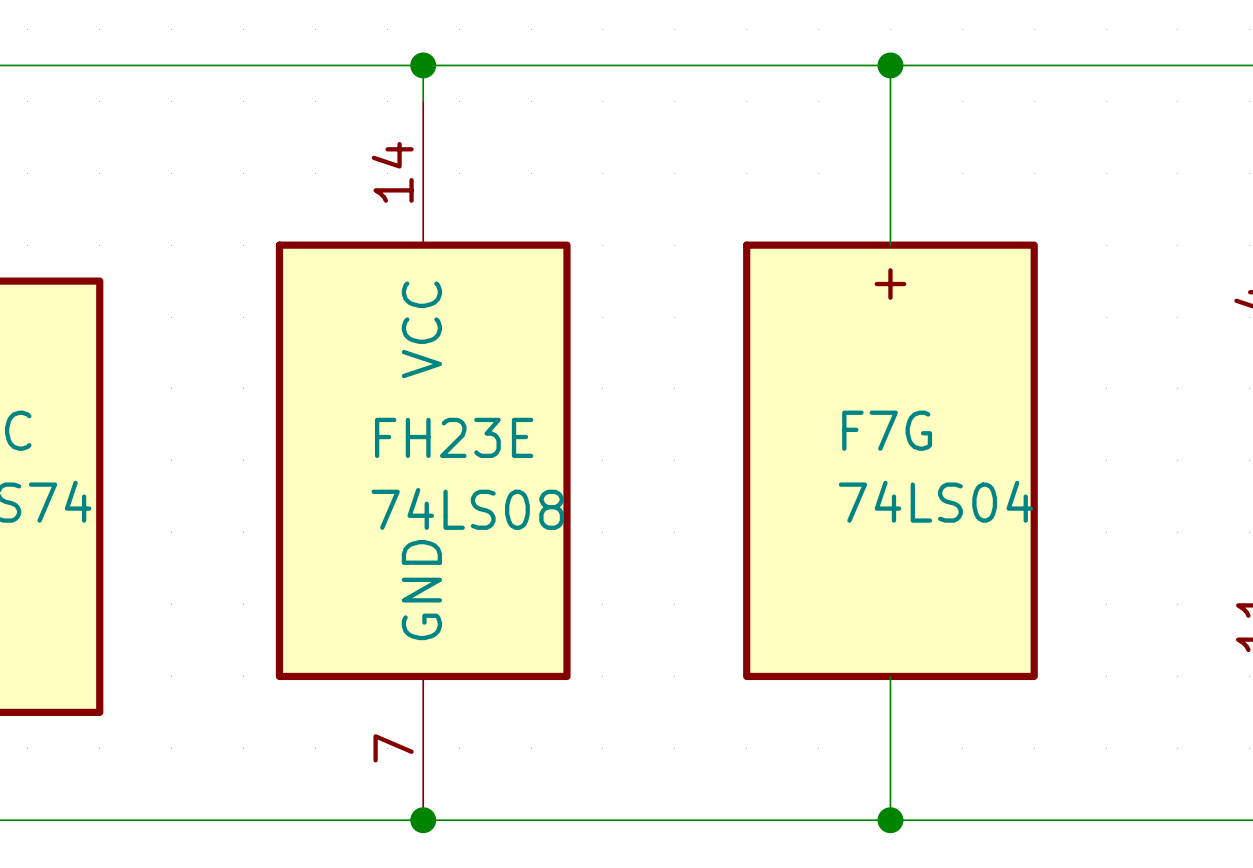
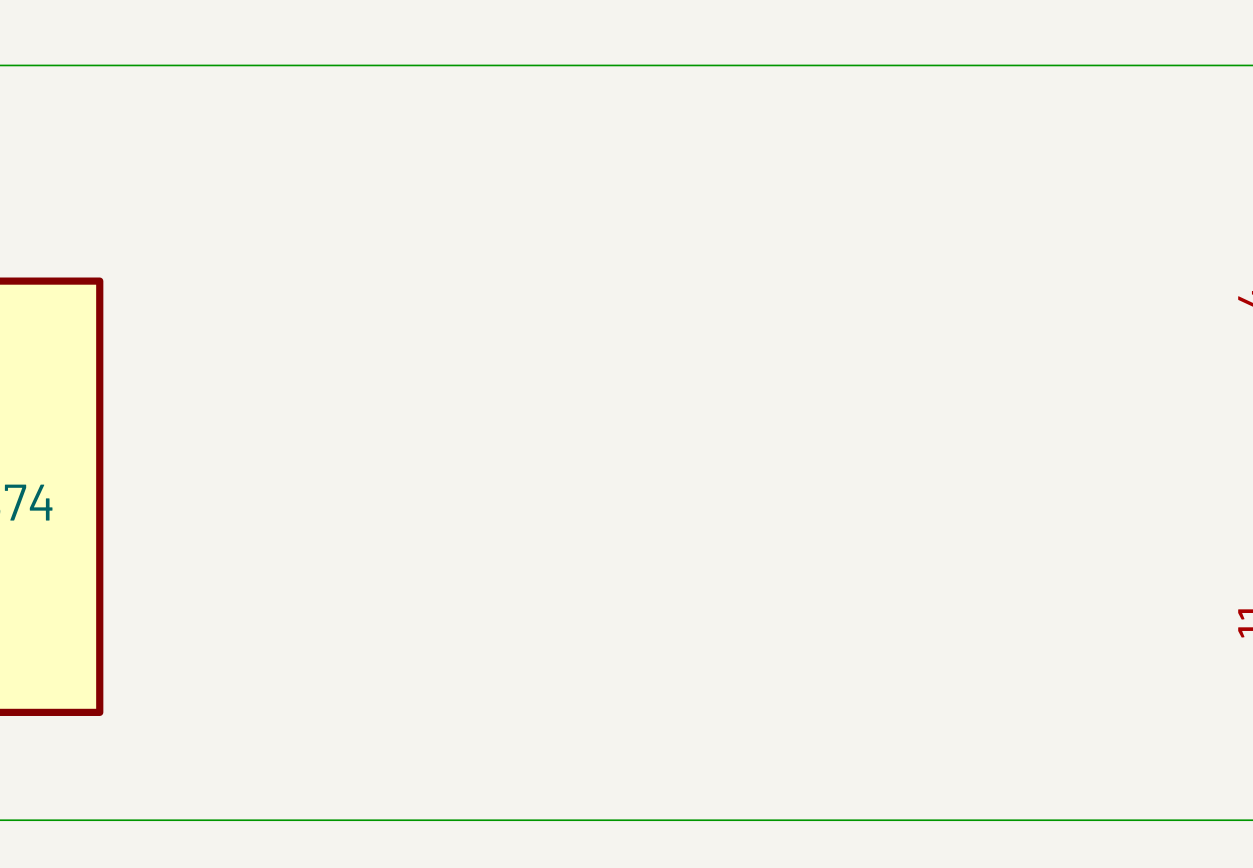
wire: (423, 65) (423, 101) -> none
junction: (423, 65) -> none
wire: (890, 65) (890, 245) -> none
junction: (890, 65) -> none
FH23E: 74LS08 (423, 460) -> none
F7G: 74LS04 (890, 460) -> none
wire: (890, 676) (890, 820) -> none
junction: (423, 820) -> none
junction: (890, 820) -> none

